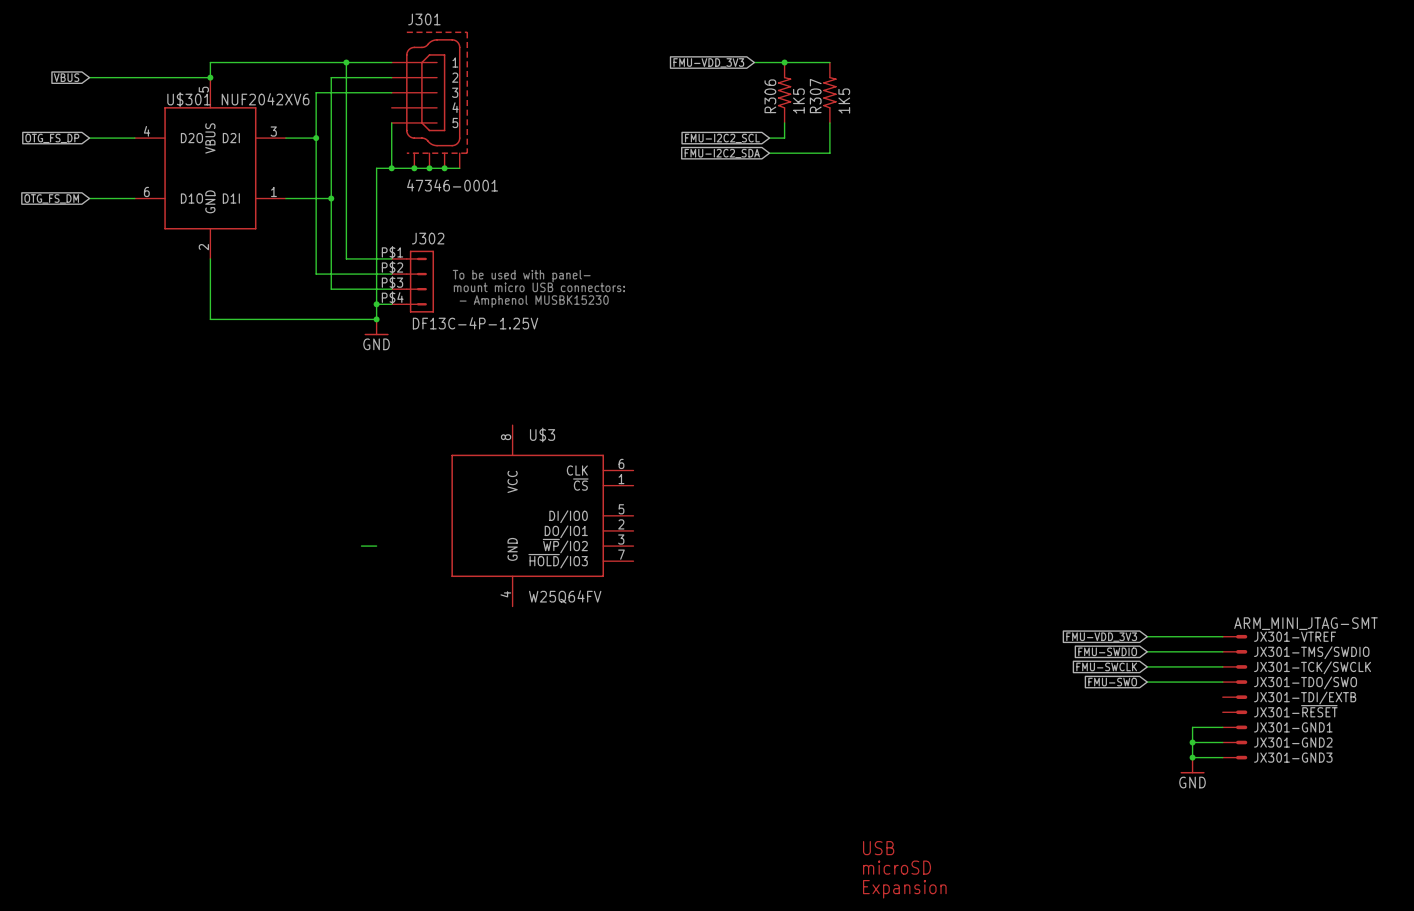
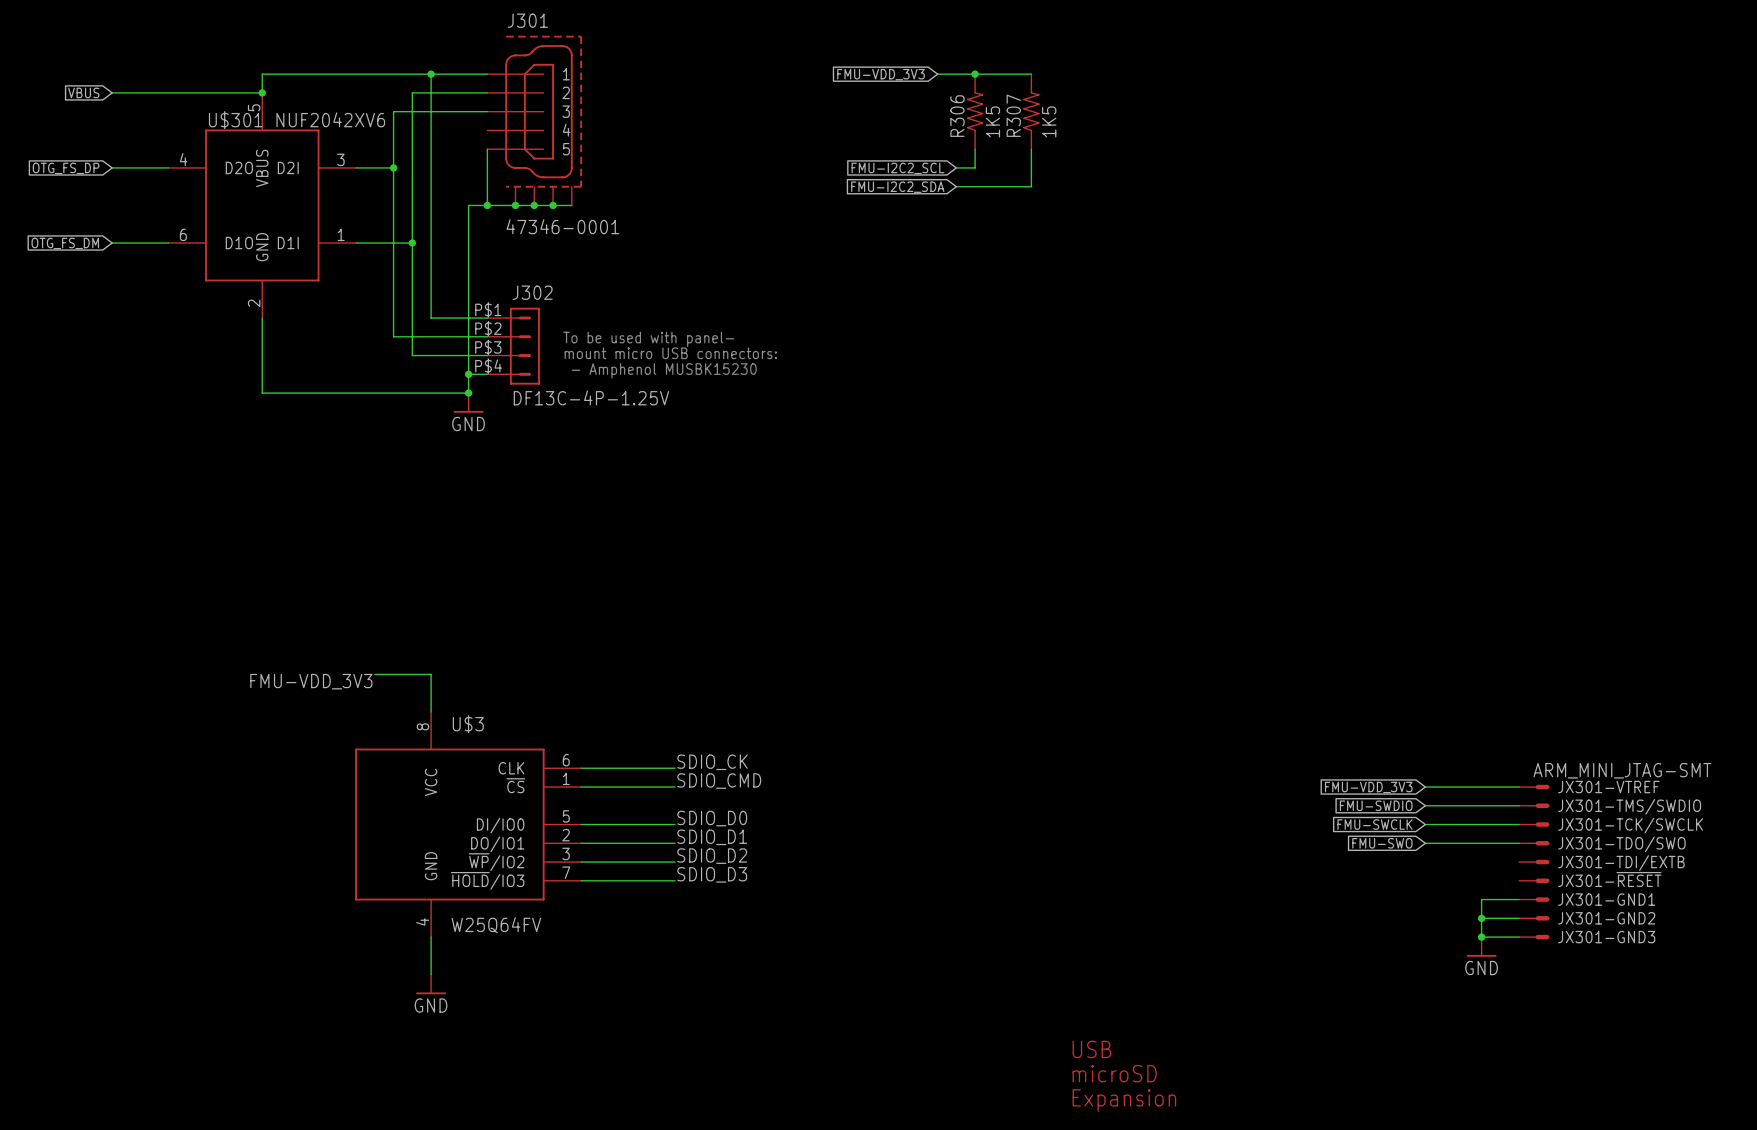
U$3 position: (542, 515) -> (468, 824)
wire: none -> (374, 674) (431, 674) (431, 711)
wire: (361, 546) (376, 546) -> none
label: none -> FMU-VDD_3V3 (311, 681)
label: none -> SDIO_CK (712, 762)
wire: none -> (581, 768) (674, 768)
label: none -> SDIO_CMD (719, 781)
wire: none -> (581, 787) (674, 787)
label: none -> SDIO_D0 (712, 818)
wire: none -> (581, 824) (674, 824)
label: none -> SDIO_D1 (712, 837)
wire: none -> (581, 843) (674, 843)
label: none -> SDIO_D2 (712, 856)
wire: none -> (581, 862) (674, 862)
label: none -> SDIO_D3 (712, 874)
wire: none -> (581, 880) (674, 880)
wire: none -> (431, 937) (431, 974)
power symbol: none -> GND (431, 984)

